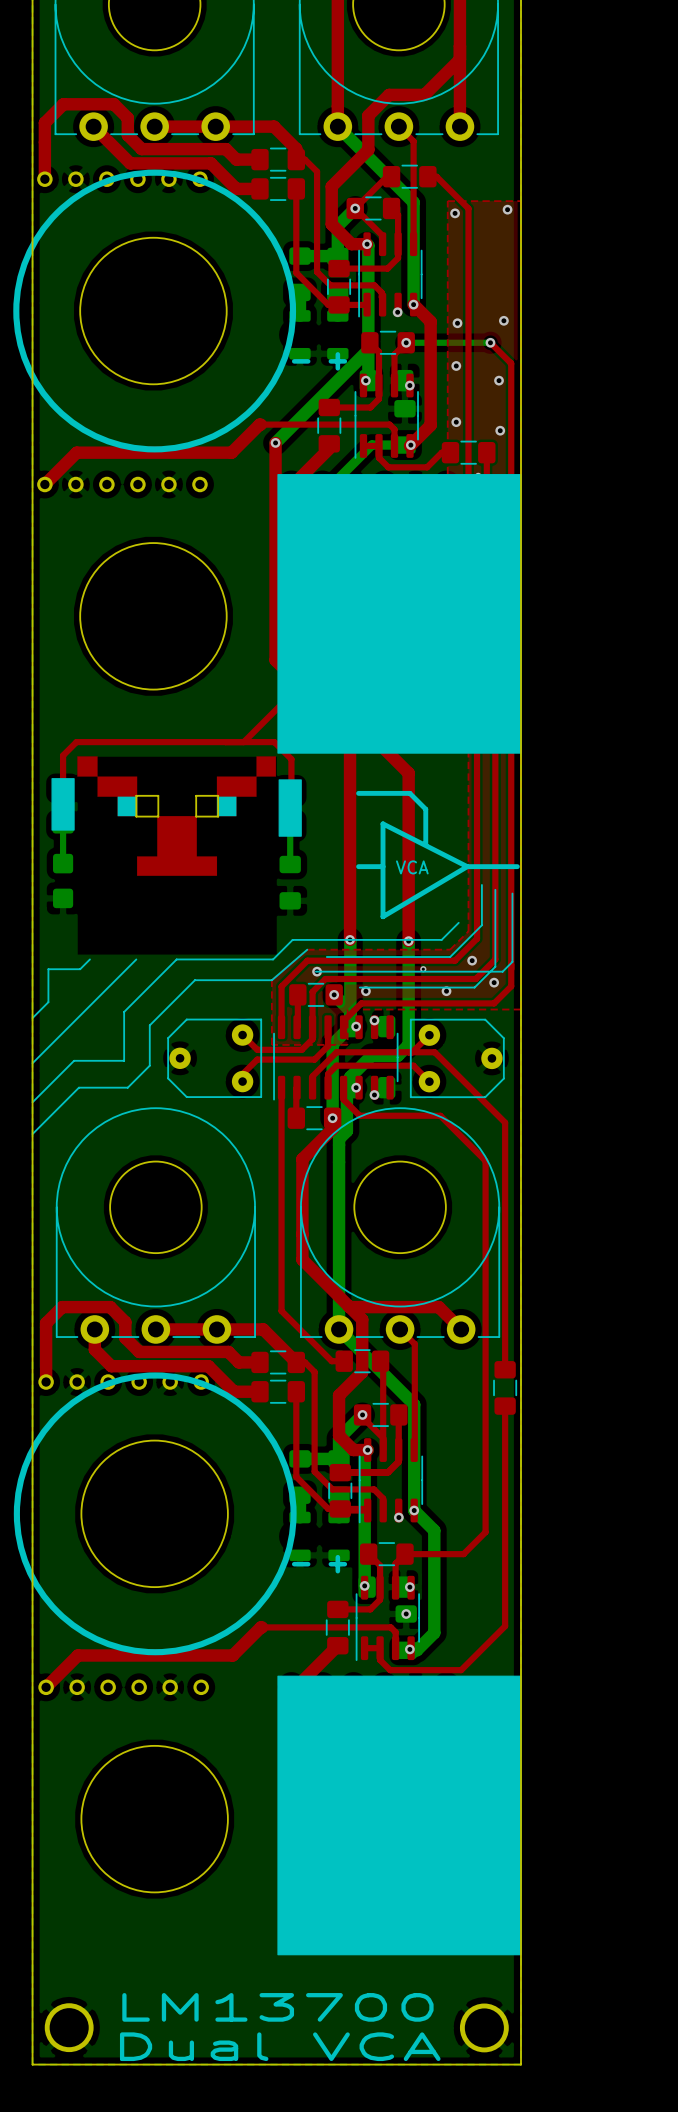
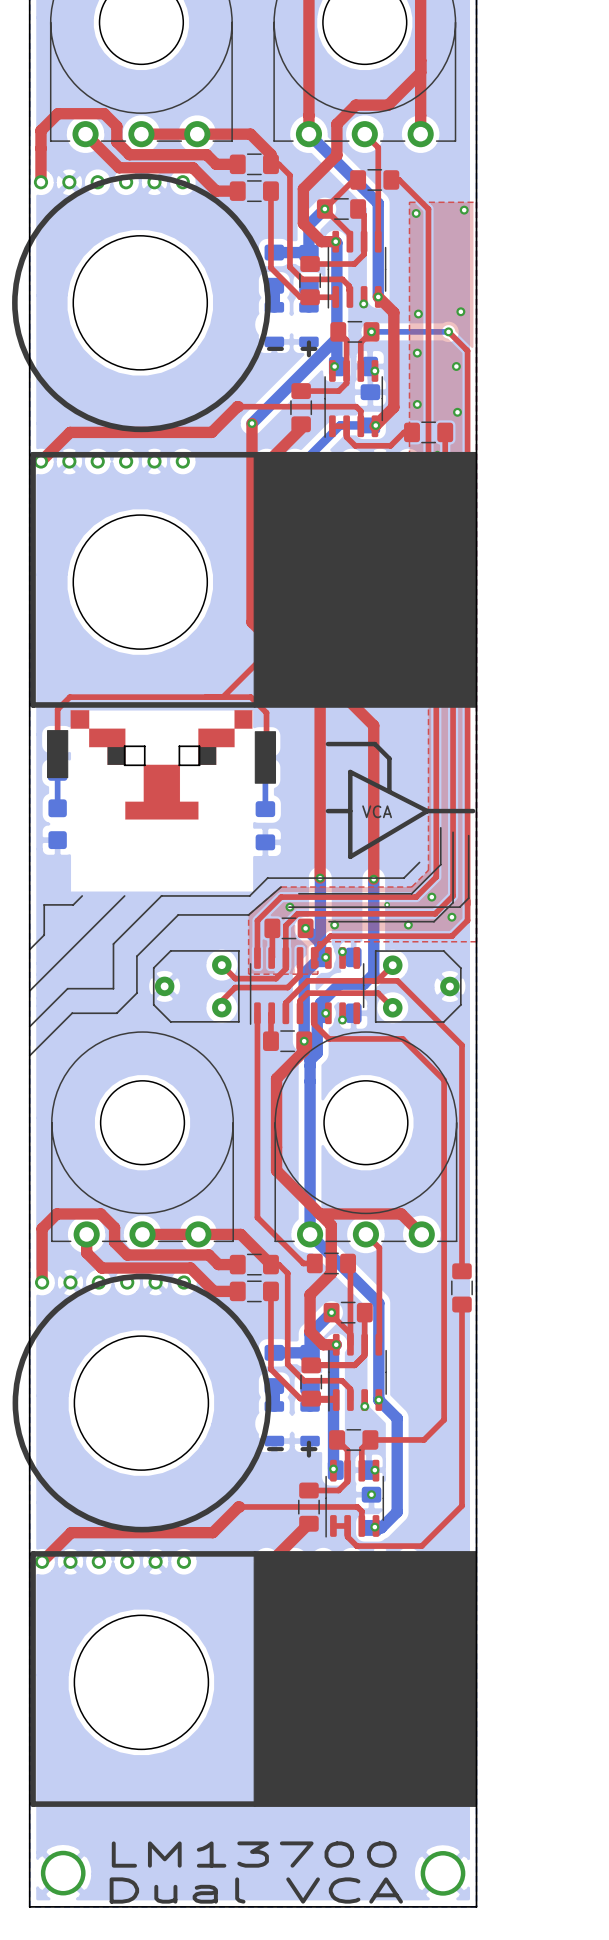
line: none -> (254, 454) (33, 454) (33, 704) (254, 704)
line: none -> (254, 1553) (33, 1553) (33, 1804) (254, 1804)

